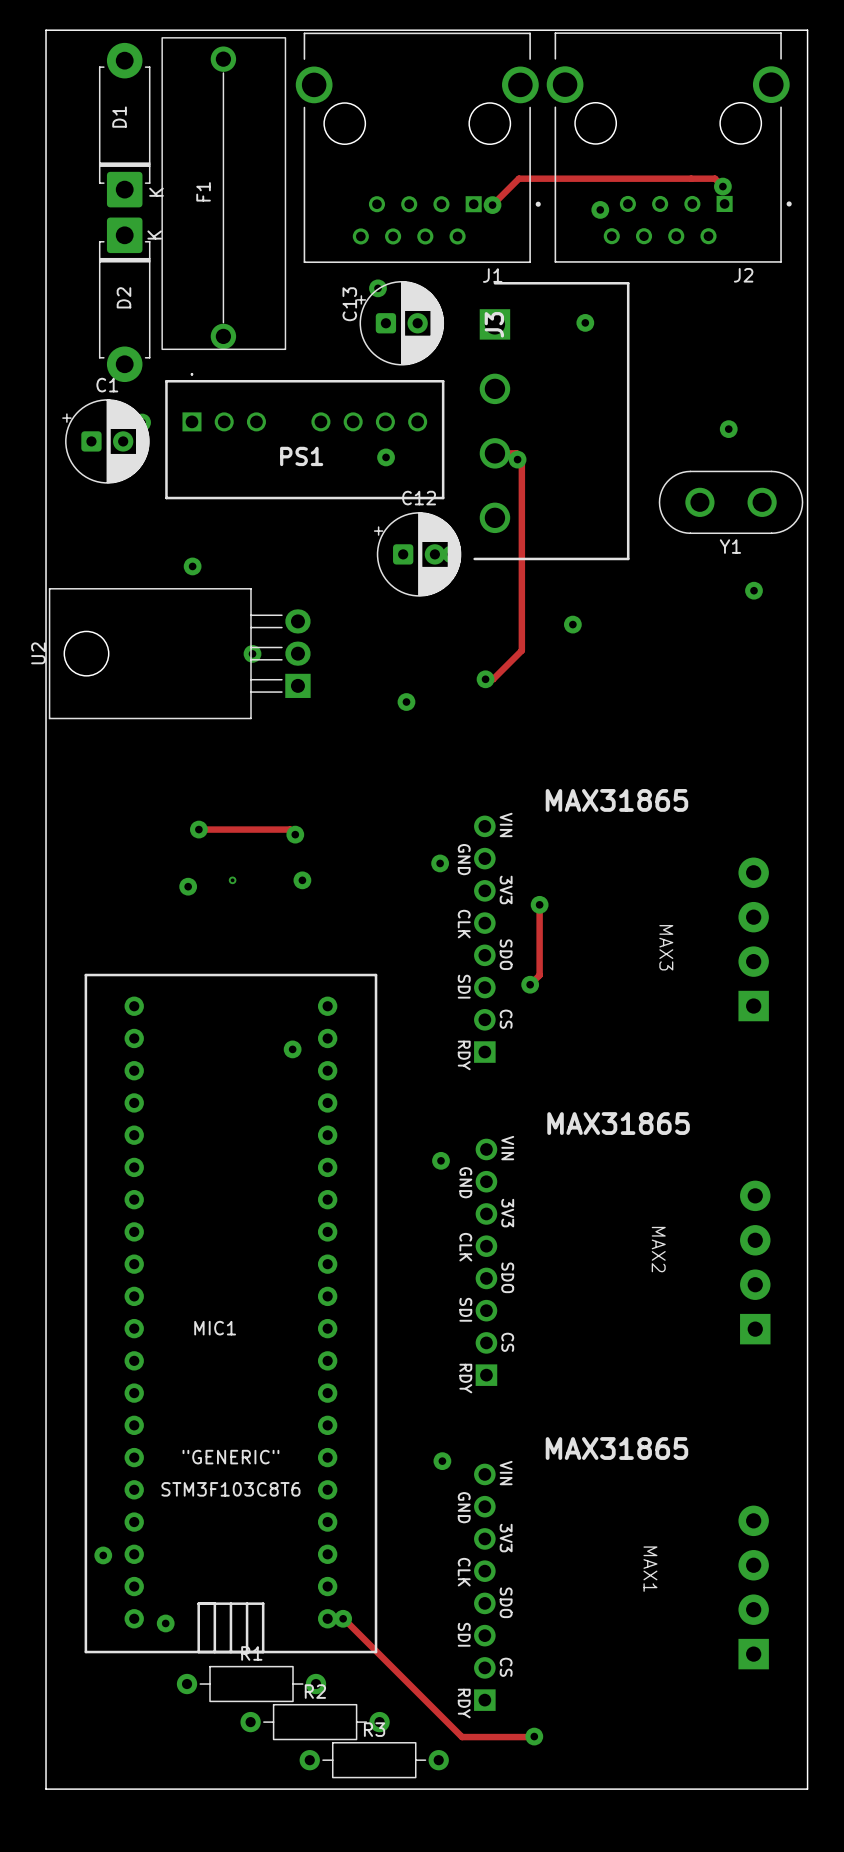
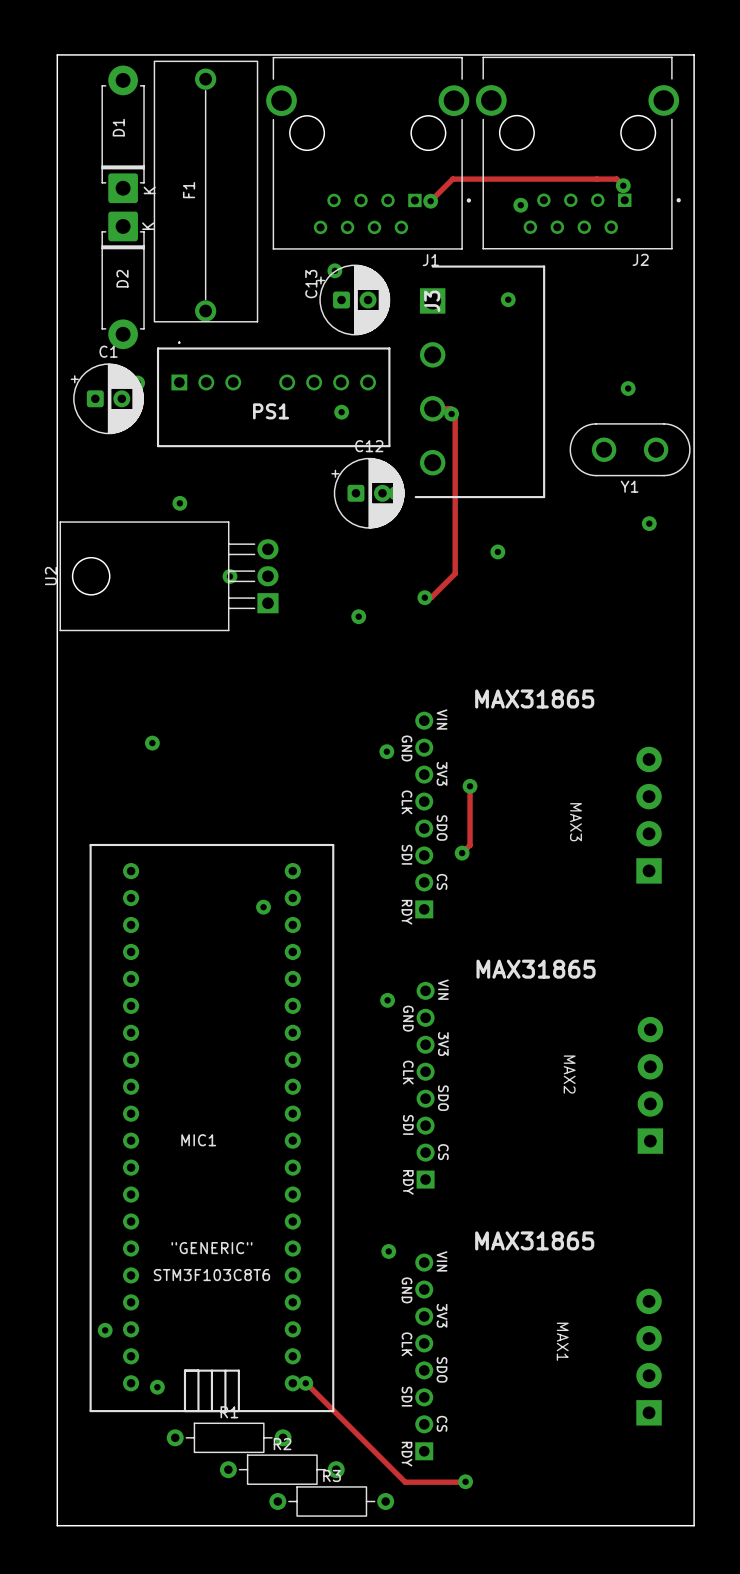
track: (198, 829) (290, 829) (295, 834) -> none
via: (198, 829) -> none
via: (295, 834) -> none
via: none -> (152, 743)
via: (232, 880) -> none
via: (302, 880) -> none
via: (188, 886) -> none

